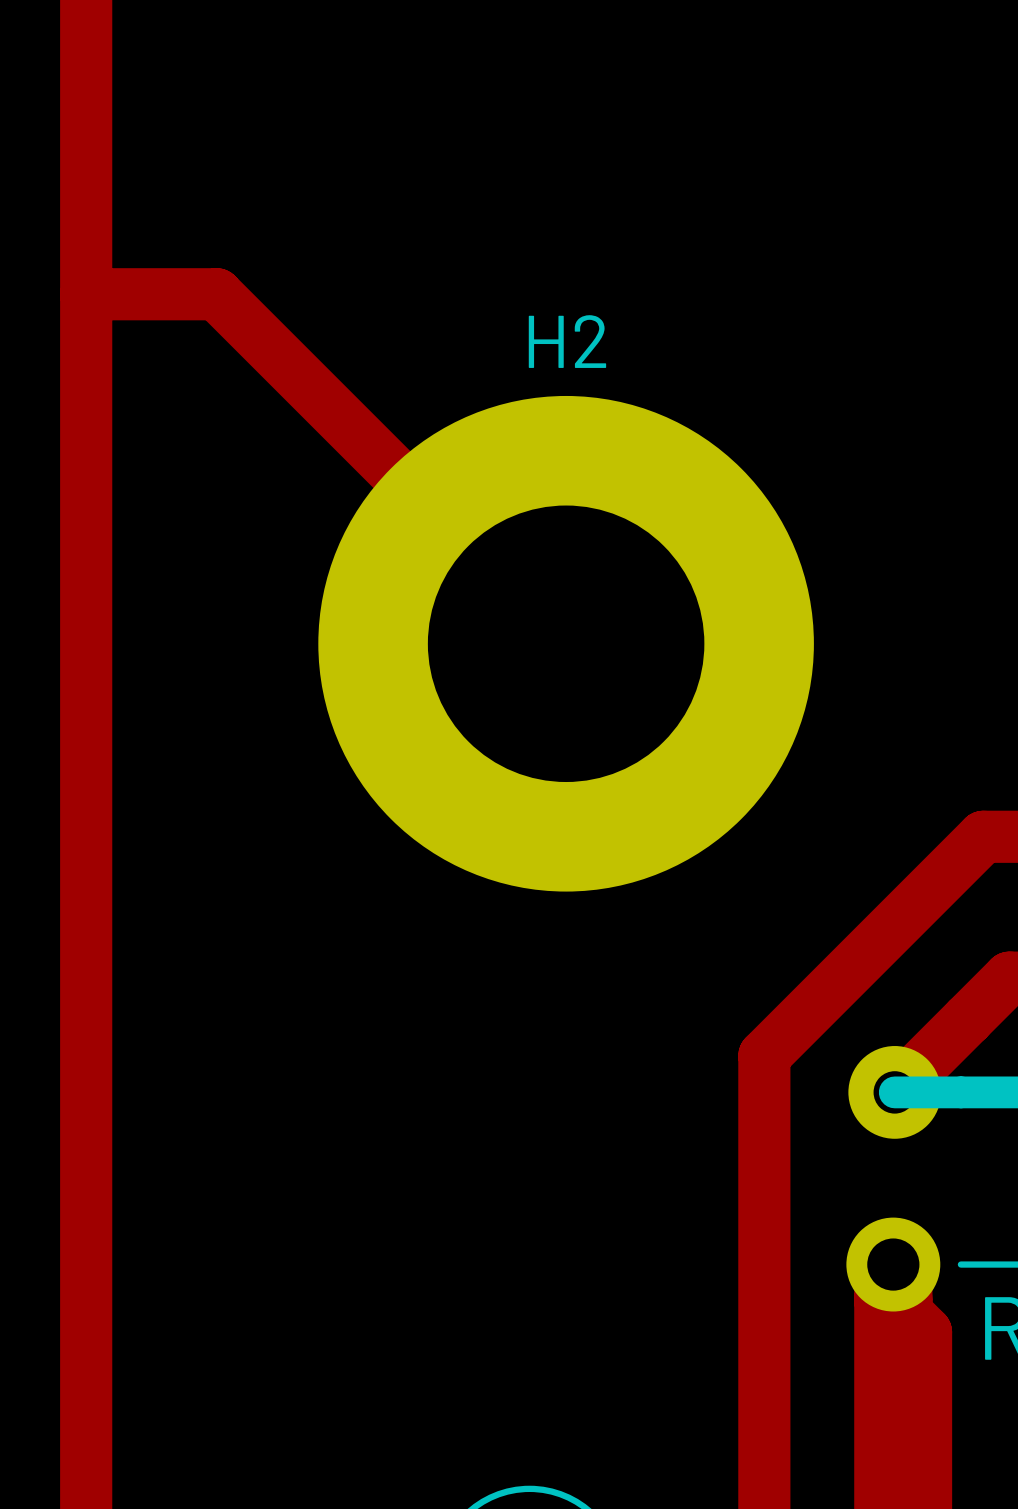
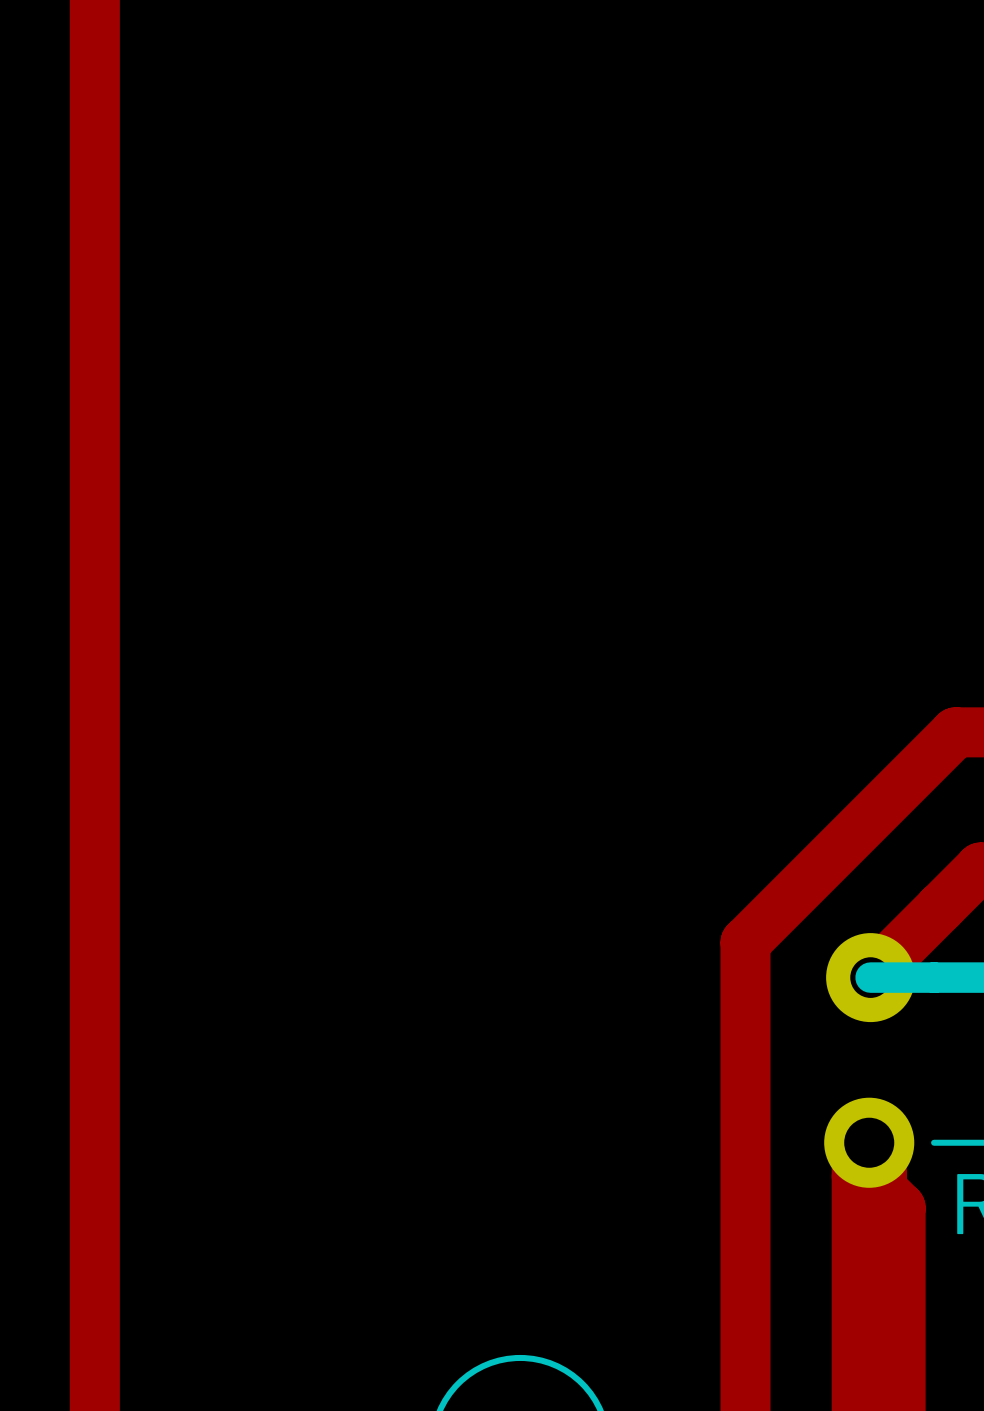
track: (86, 294) (216, 294) (566, 643) -> none
H2: (566, 643) -> none

